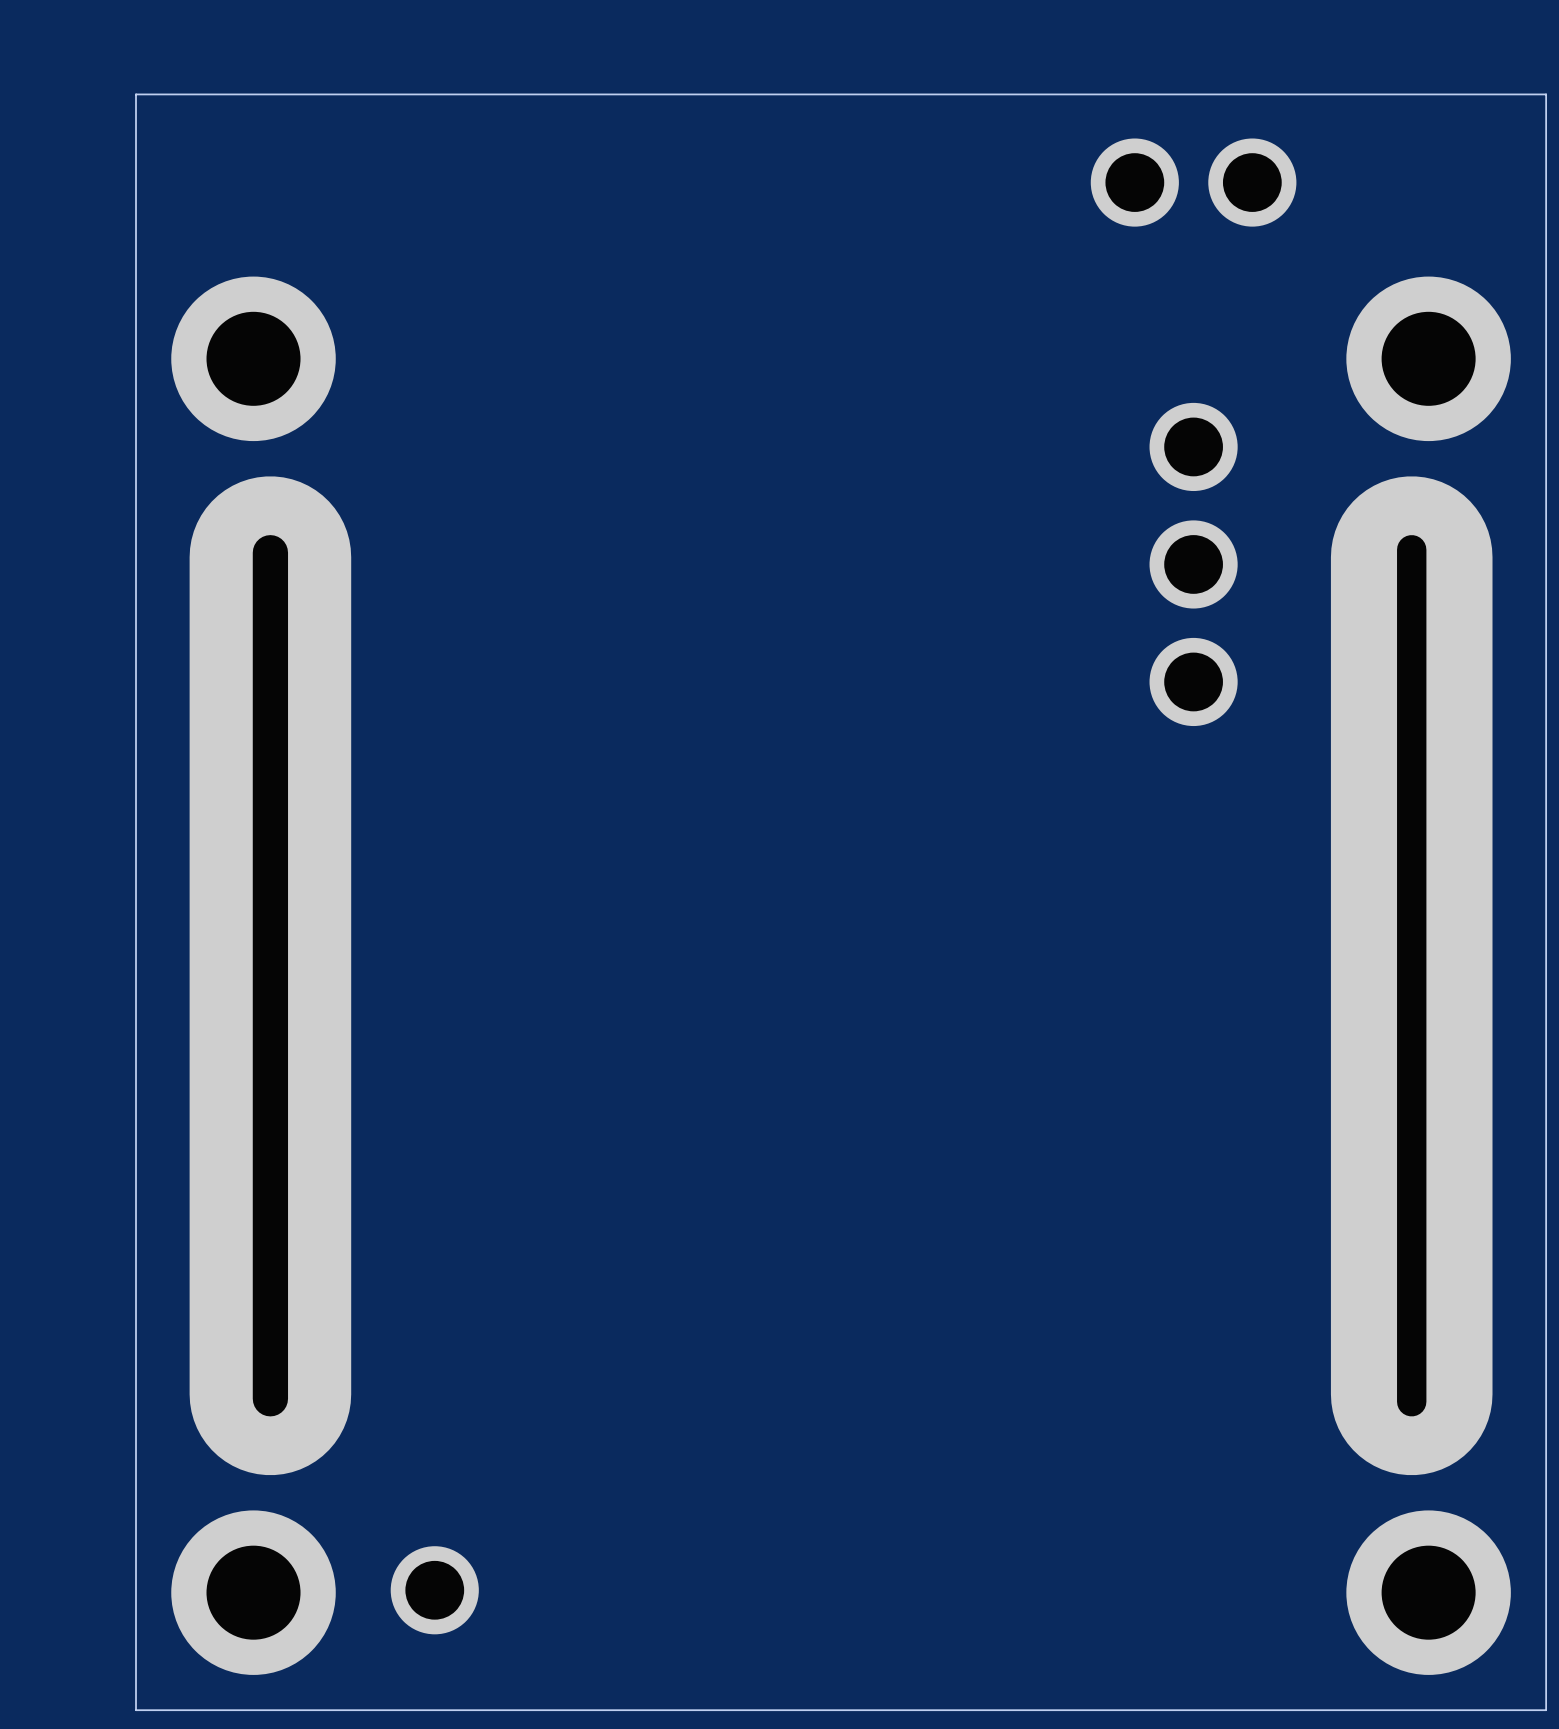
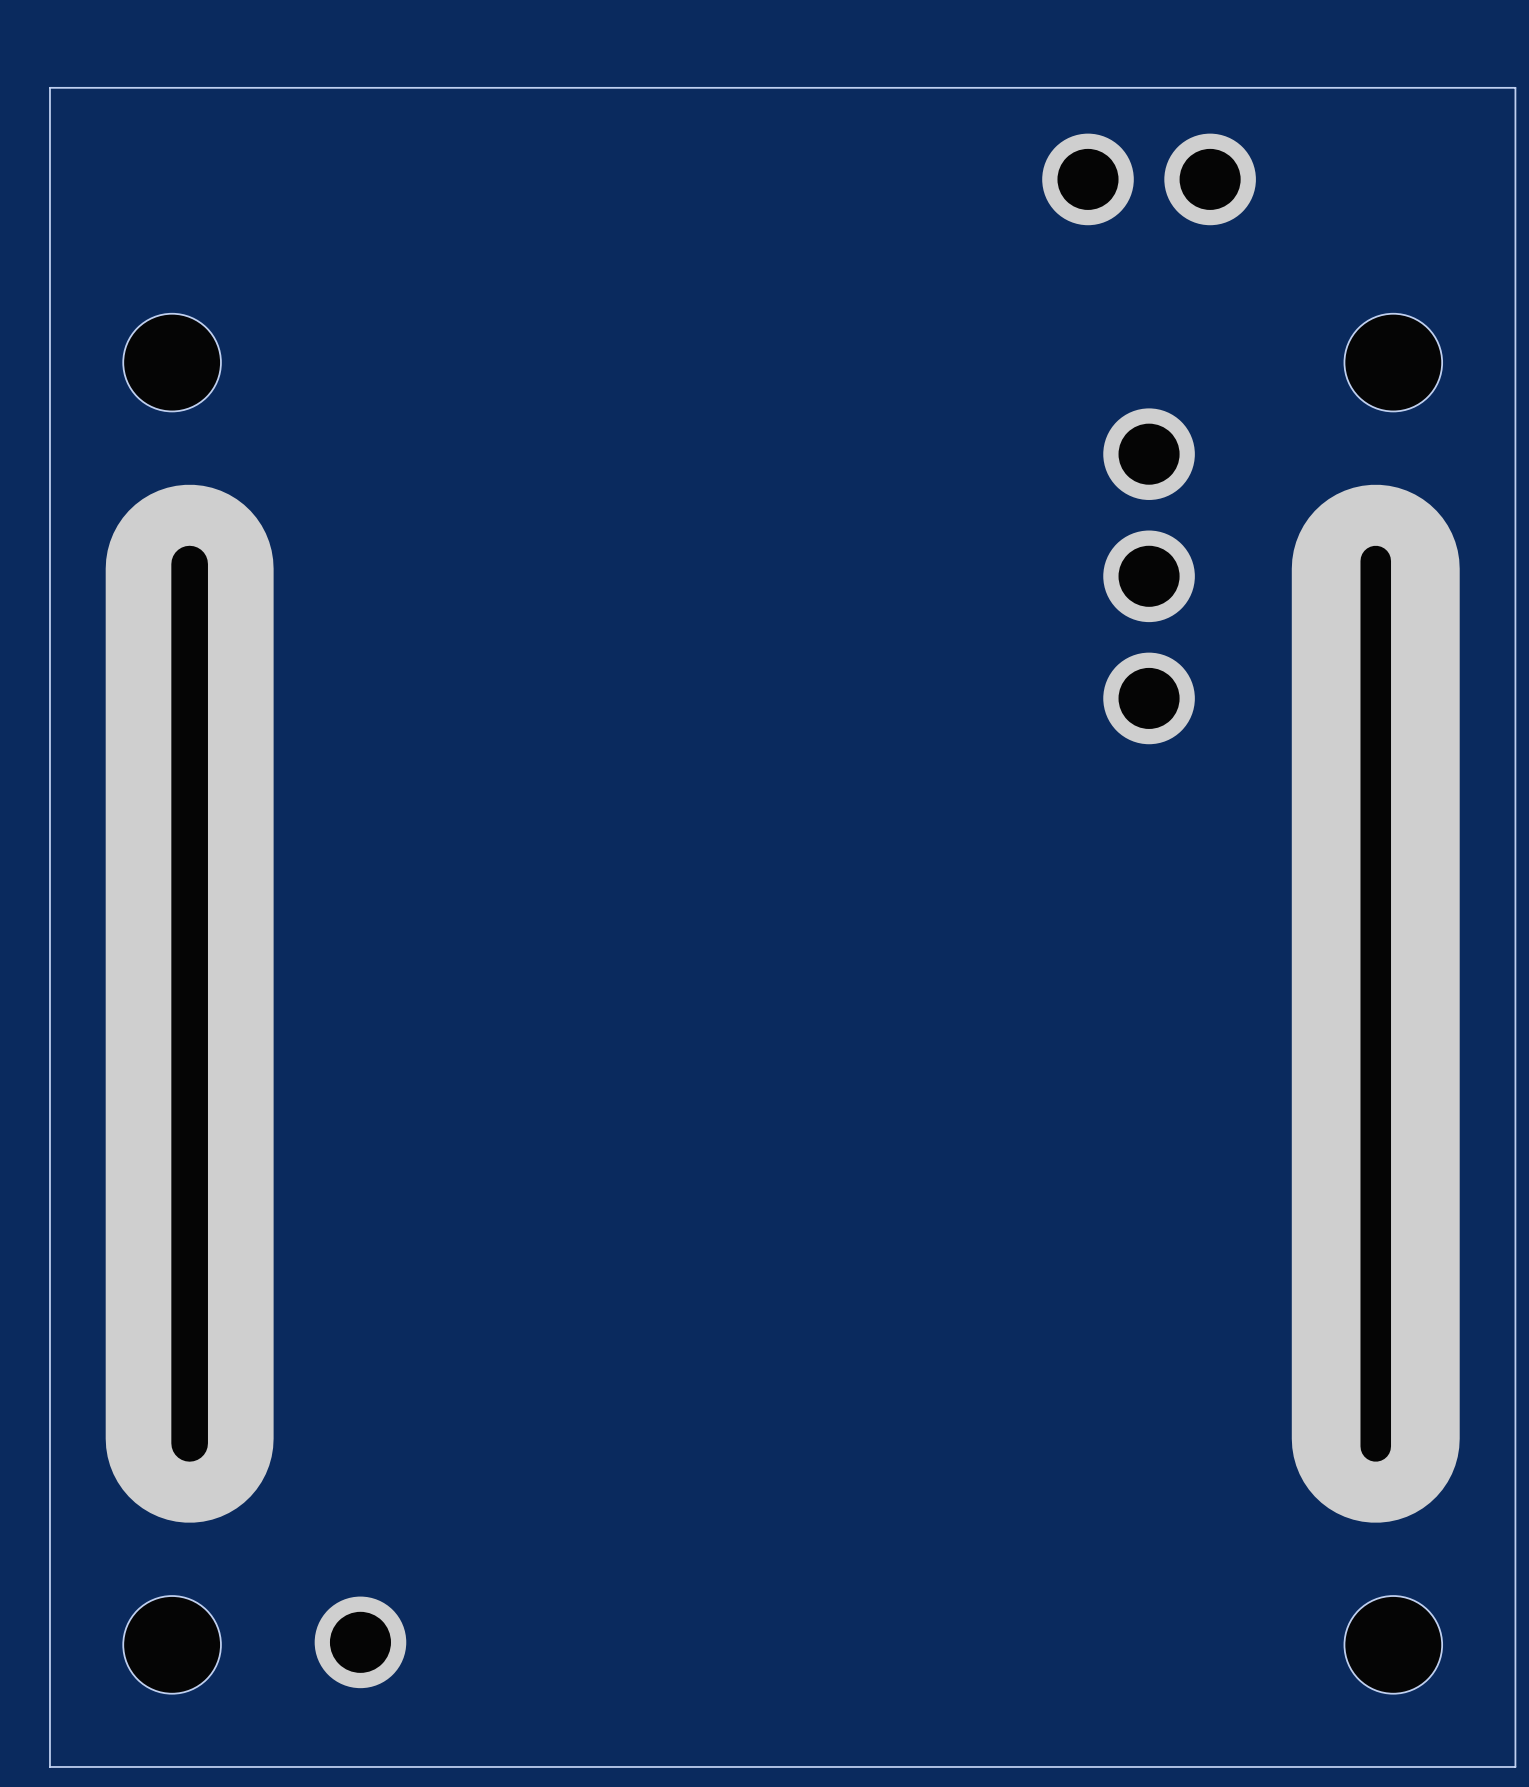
part footprint: [171, 276, 336, 442] -> [123, 313, 221, 412]
part footprint: [1346, 276, 1511, 442] -> [1344, 313, 1443, 412]
part footprint: [171, 1510, 336, 1675] -> [123, 1596, 221, 1694]
part footprint: [1346, 1510, 1511, 1675] -> [1344, 1596, 1443, 1694]

